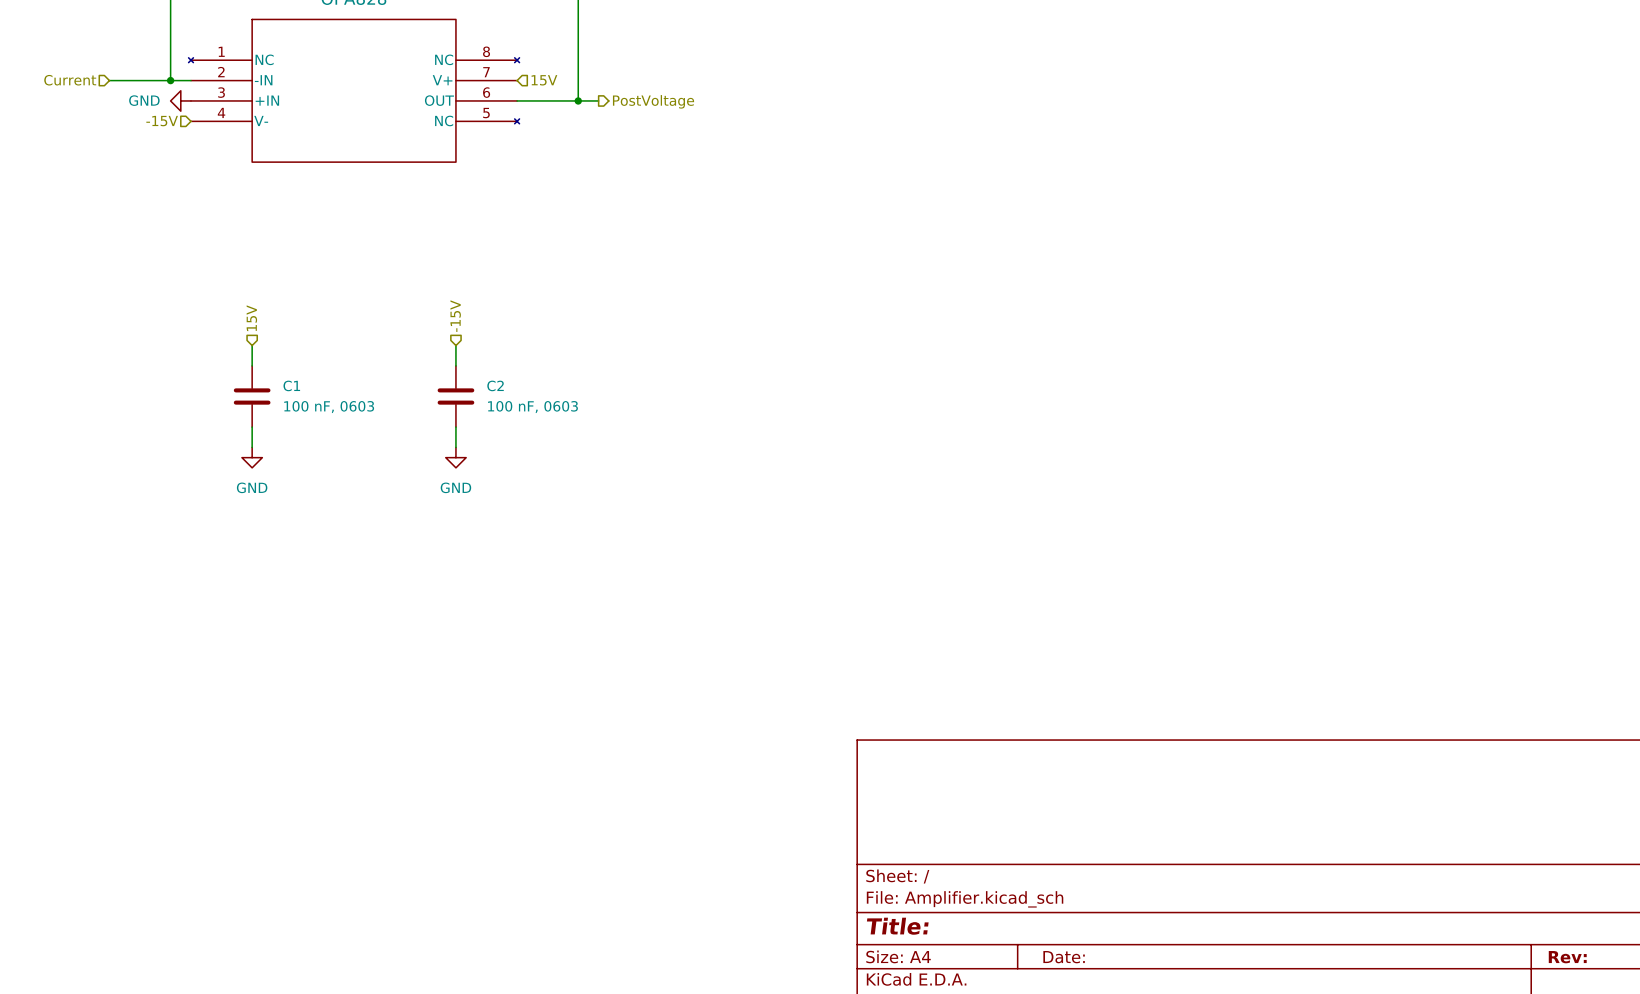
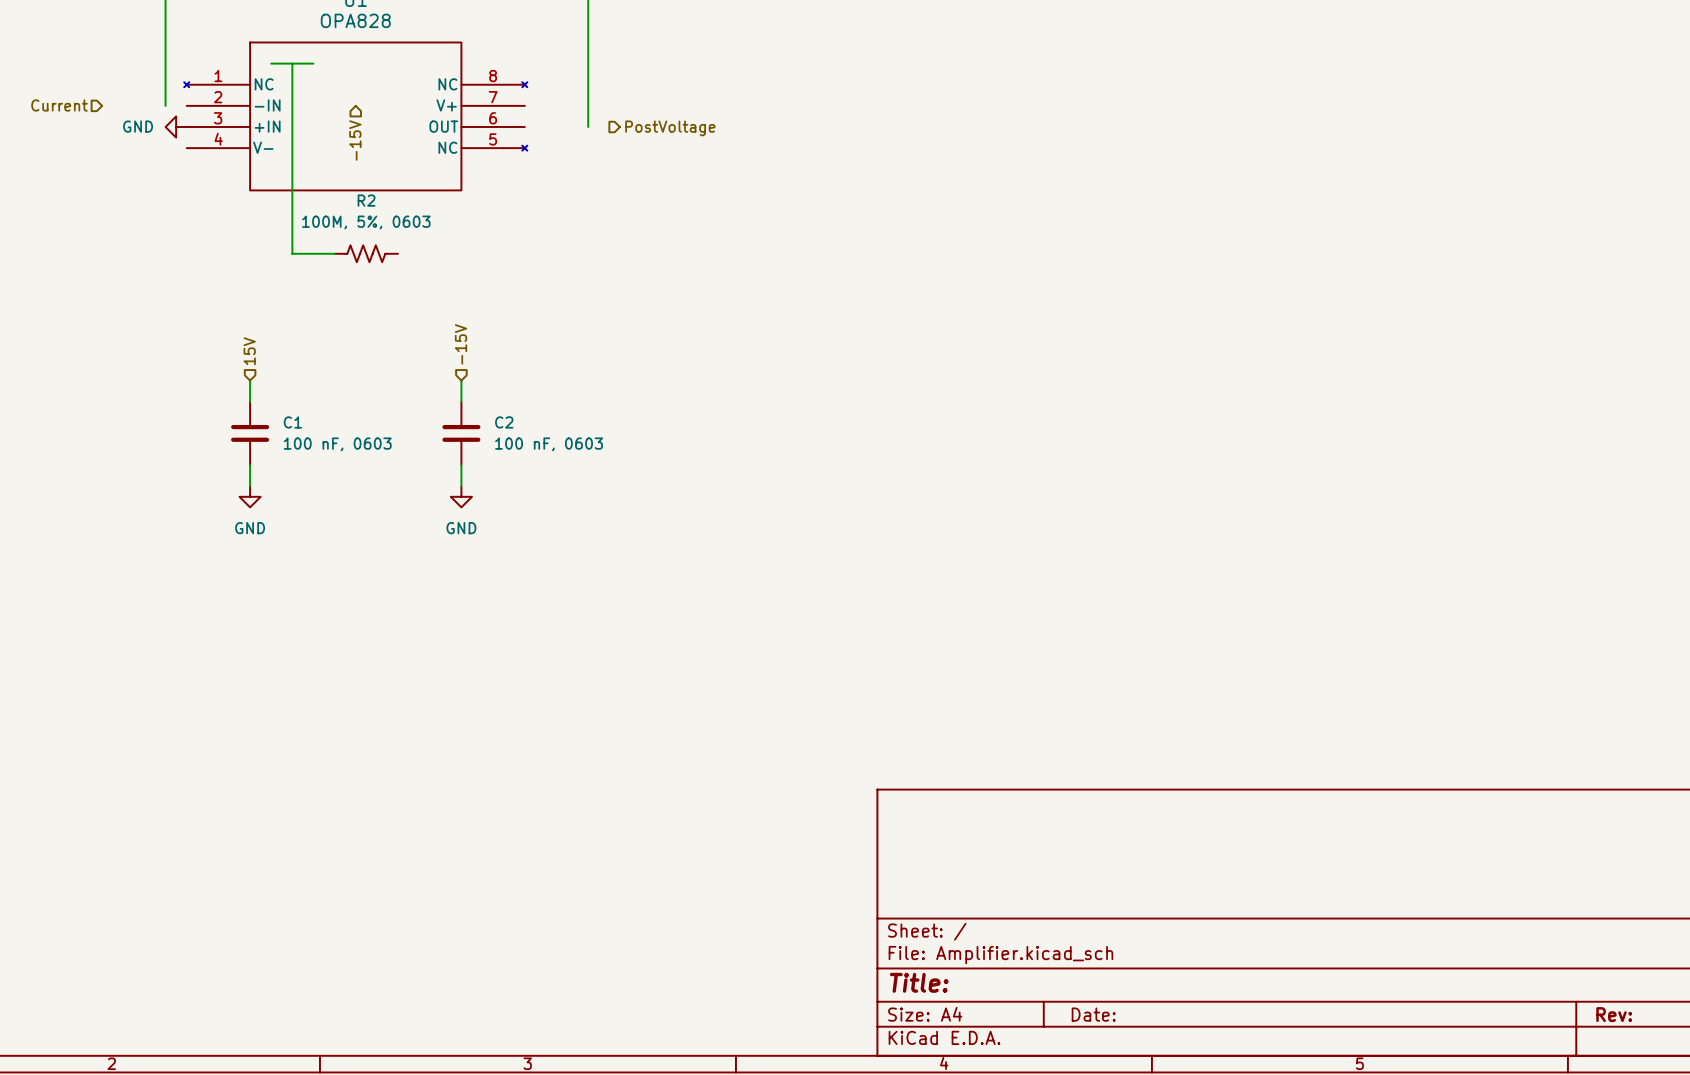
wire: none -> (271, 63) (313, 63)
wire: none -> (292, 63) (292, 253) (334, 253)
wire: (109, 80) (191, 80) -> none
junction: (170, 80) -> none
hierarchical label: 15V (544, 80) -> none
wire: (517, 100) (598, 100) -> none
junction: (578, 100) -> none
hierarchical label rotation: 0° (162, 121) -> 90° counterclockwise (355, 140)
hierarchical label position: -15V (162, 121) -> -15V (355, 140)
R2: none -> 100M, 5%, 0603 (366, 253)

